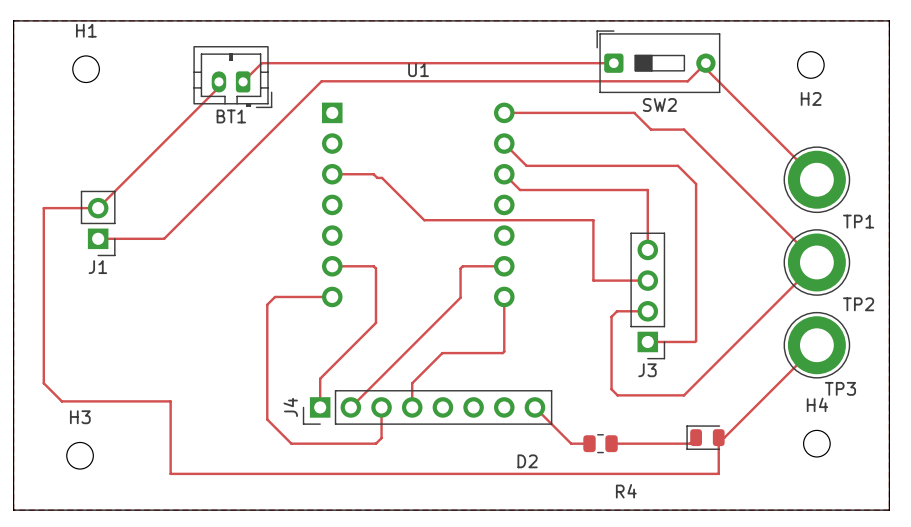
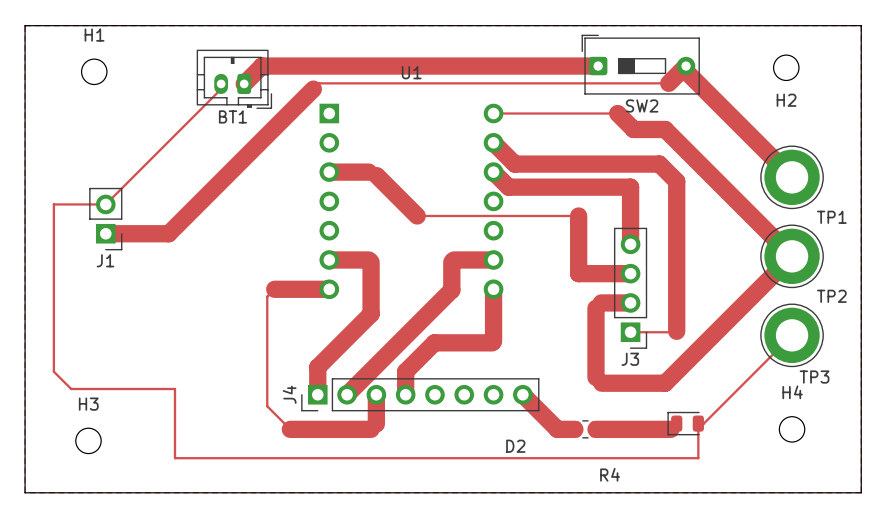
top track width: thin (613, 63) (261, 63) (243, 81) -> thick (598, 66) (262, 66) (244, 83)
top track width: thin (705, 63) (687, 81) -> thick (686, 66) (668, 83)
top track width: thin (705, 68) (816, 179) -> thick (686, 71) (792, 177)
top track width: thin (315, 87) (164, 238) (98, 238) -> thick (313, 89) (168, 233) (105, 233)
top track width: thin (634, 112) (651, 129) (684, 129) (816, 262) (684, 395) (617, 395) -> thick (617, 113) (633, 129) (665, 129) (792, 256) (665, 383) (601, 383)
top track width: thin (504, 143) (526, 165) (677, 165) (696, 183) (696, 341) -> thick (493, 142) (514, 164) (659, 164) (676, 181) (676, 331)
top track width: thin (332, 174) (373, 174) -> thick (329, 172) (368, 172)
top track width: thin (504, 174) (520, 190) (647, 190) (647, 249) -> thick (493, 172) (508, 187) (630, 187) (630, 244)
top track width: thin (382, 177) (424, 220) -> thick (376, 175) (417, 215)
top track width: thin (593, 220) (593, 280) (647, 280) -> thick (578, 215) (578, 273) (630, 273)
top track width: thin (332, 266) (373, 266) -> thick (329, 259) (368, 259)
top track width: thin (462, 266) (504, 266) -> thick (453, 259) (493, 259)
top track width: thin (375, 268) (375, 322) (320, 378) (320, 407) -> thick (371, 262) (371, 314) (317, 367) (317, 394)
top track width: thin (460, 268) (460, 297) (350, 407) -> thick (451, 262) (451, 290) (347, 394)
top track width: thin (275, 296) (332, 296) -> thick (274, 289) (329, 289)
top track width: thin (504, 296) (504, 351) -> thick (493, 289) (493, 341)
top track width: thin (617, 311) (647, 311) -> thick (601, 302) (630, 302)
top track width: thin (611, 316) (611, 389) -> thick (595, 308) (595, 377)
top track width: thin (502, 353) (442, 353) (412, 383) (412, 407) -> thick (492, 342) (434, 342) (405, 371) (405, 394)
top track width: thin (381, 407) (381, 438) -> thick (376, 394) (376, 424)
top track width: thin (534, 407) (571, 443) (589, 443) -> thick (522, 394) (557, 429) (574, 429)
top track width: thin (291, 443) (375, 443) -> thick (290, 429) (371, 429)
top track width: thin (611, 443) (690, 443) -> thick (595, 429) (670, 429)

